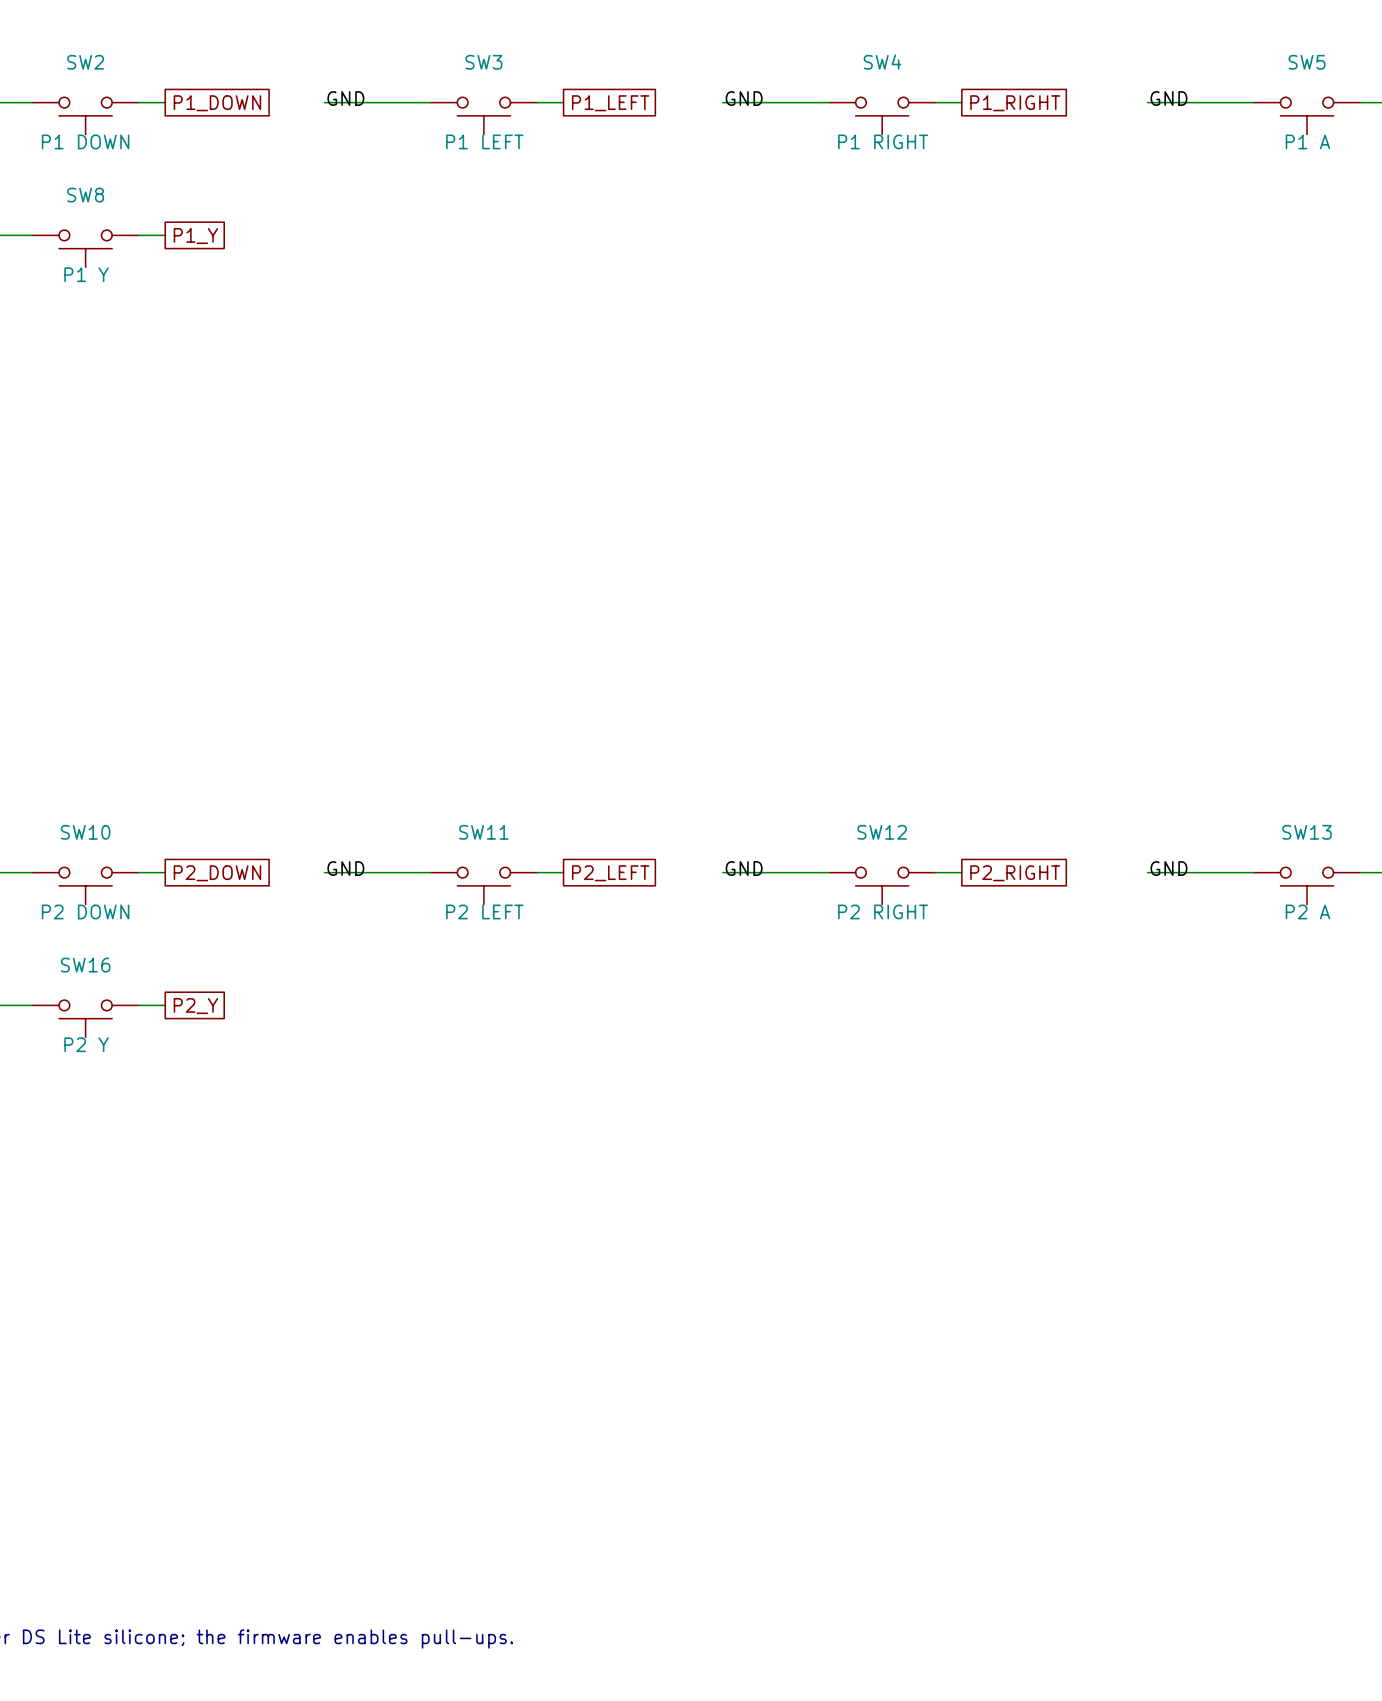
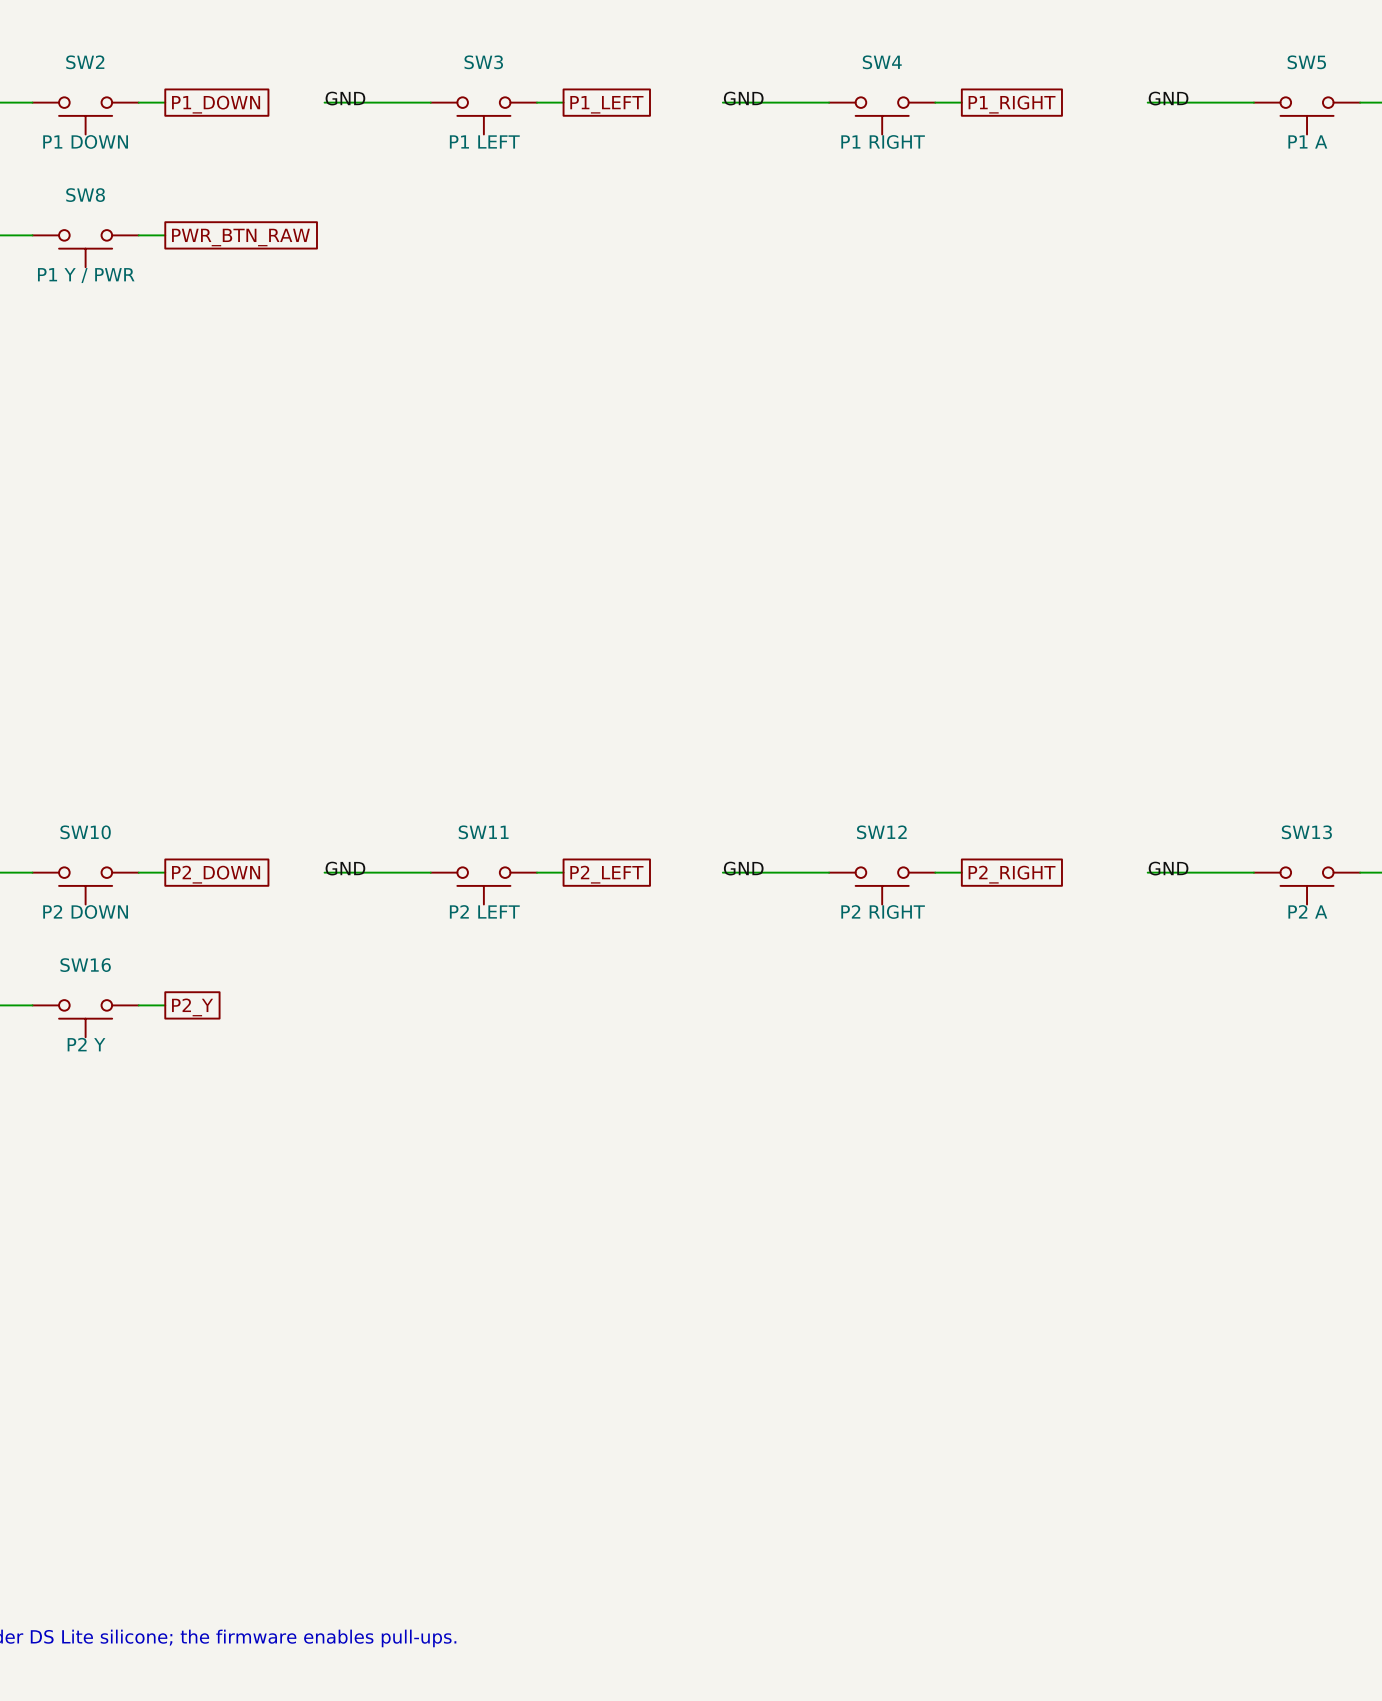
global label: P1_Y (195, 236) -> PWR_BTN_RAW (240, 237)
SW8 value: P1 Y (86, 274) -> P1 Y / PWR (86, 275)

